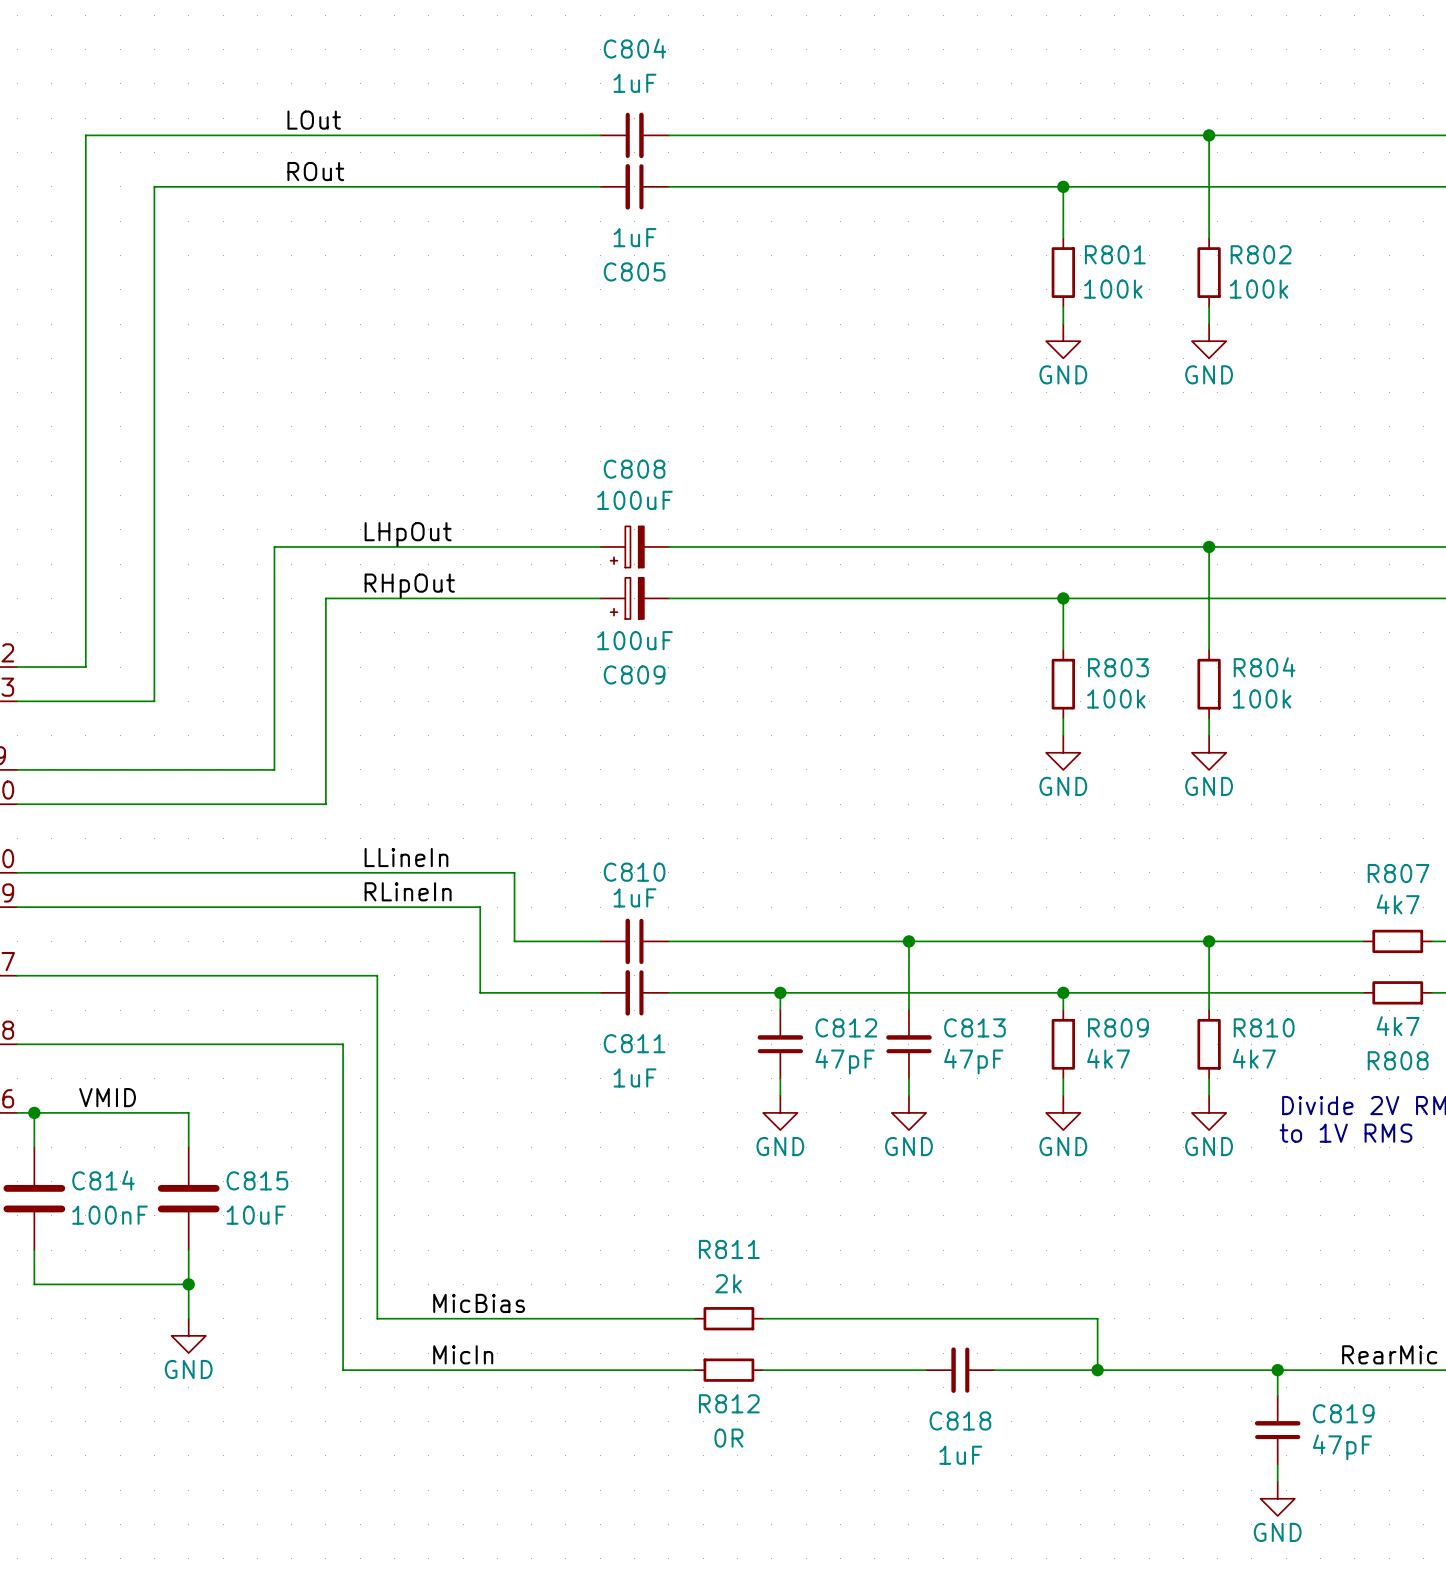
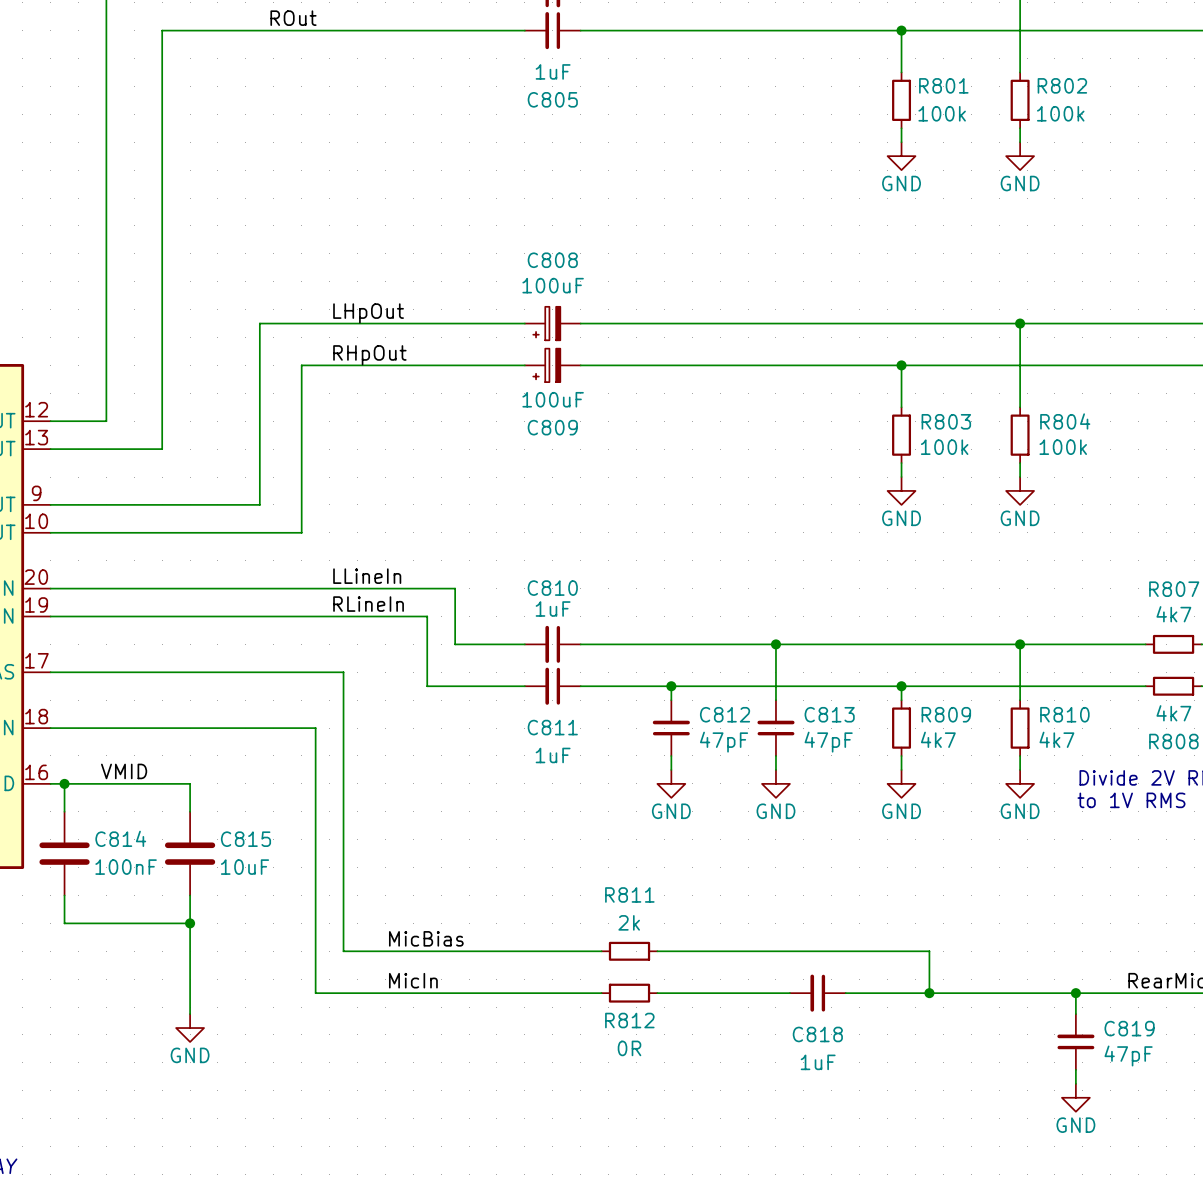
wire: none -> (190, 951) (190, 1014)
power symbol position: GND (188, 1335) -> GND (190, 1028)

